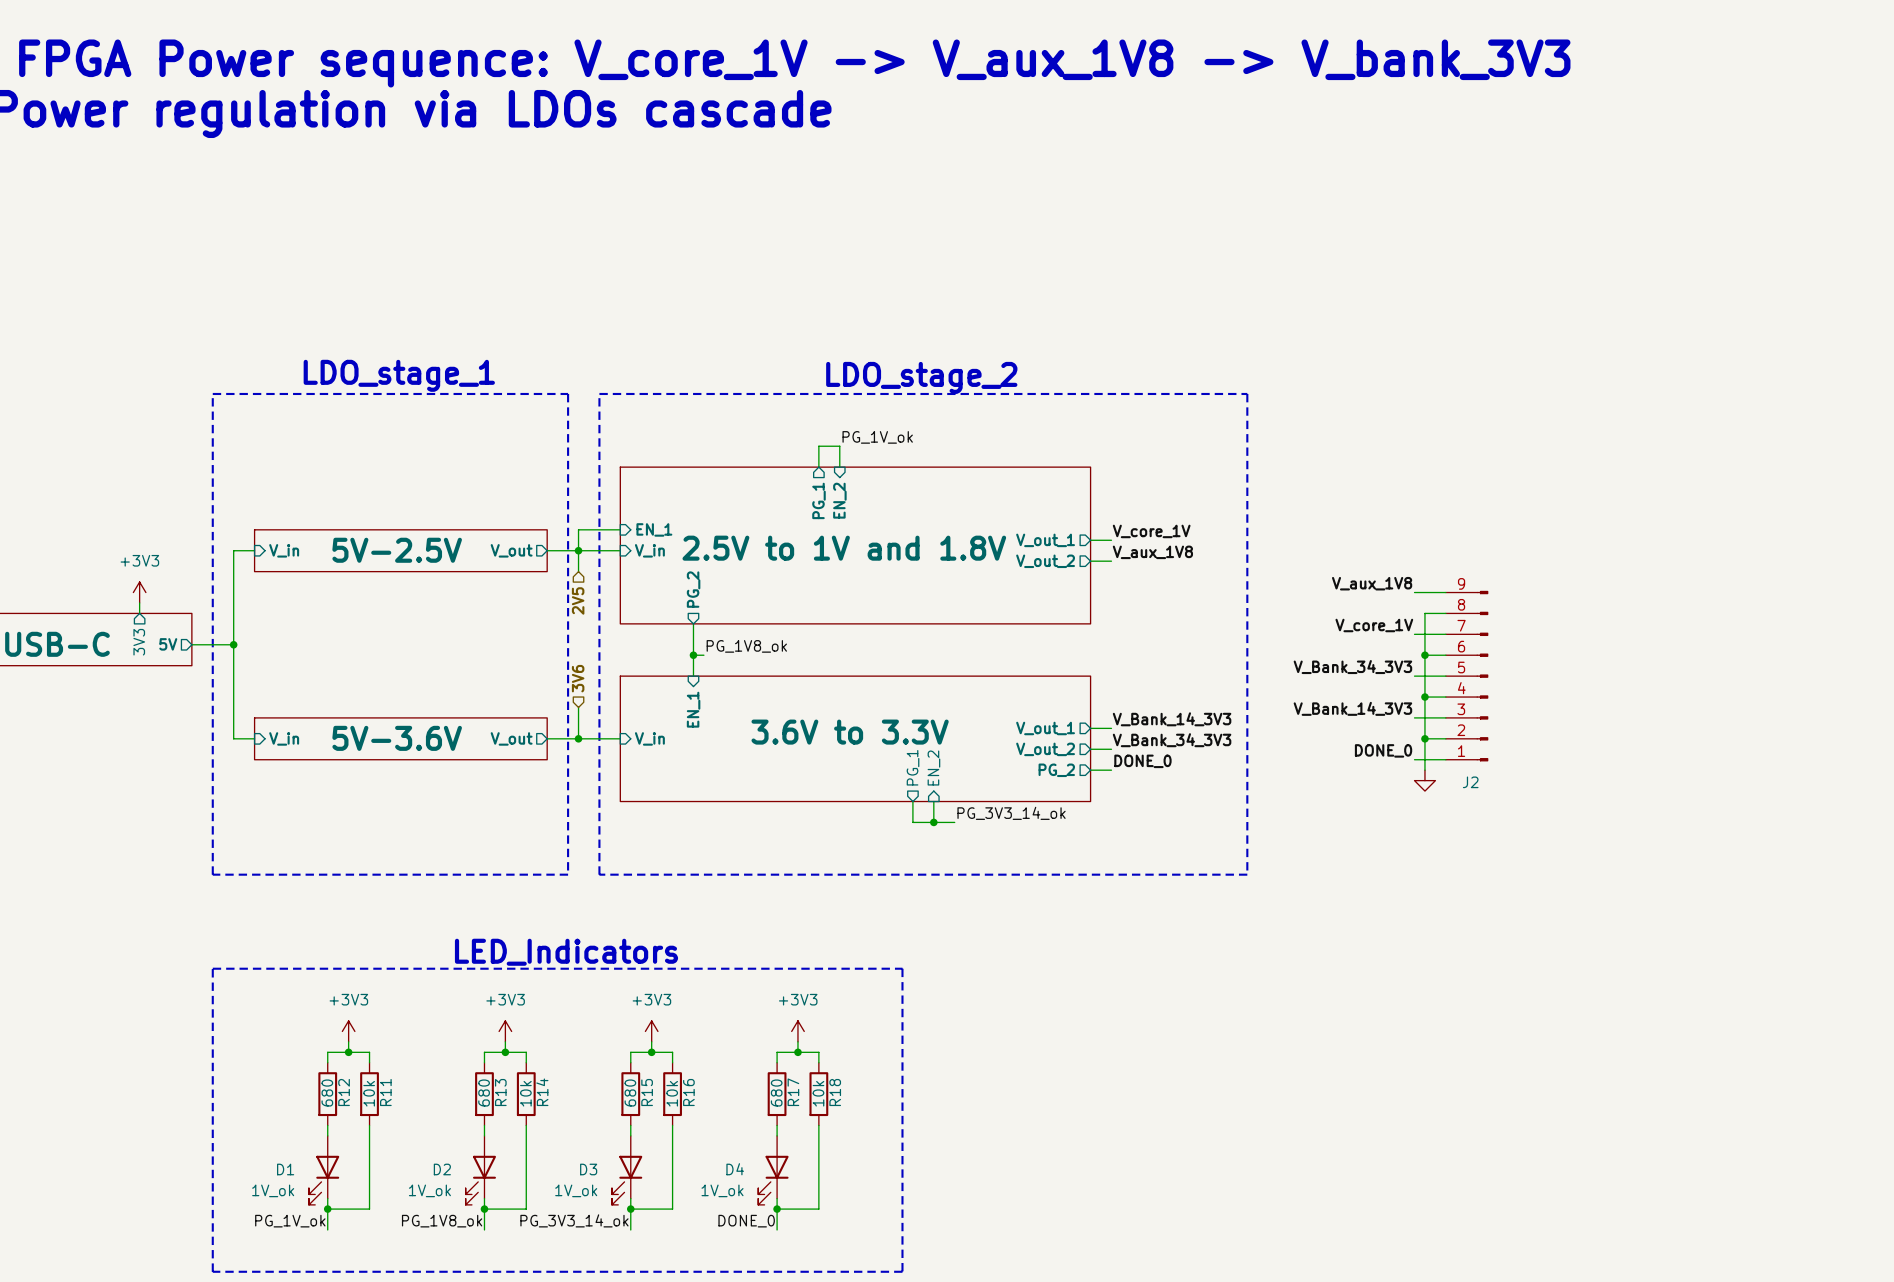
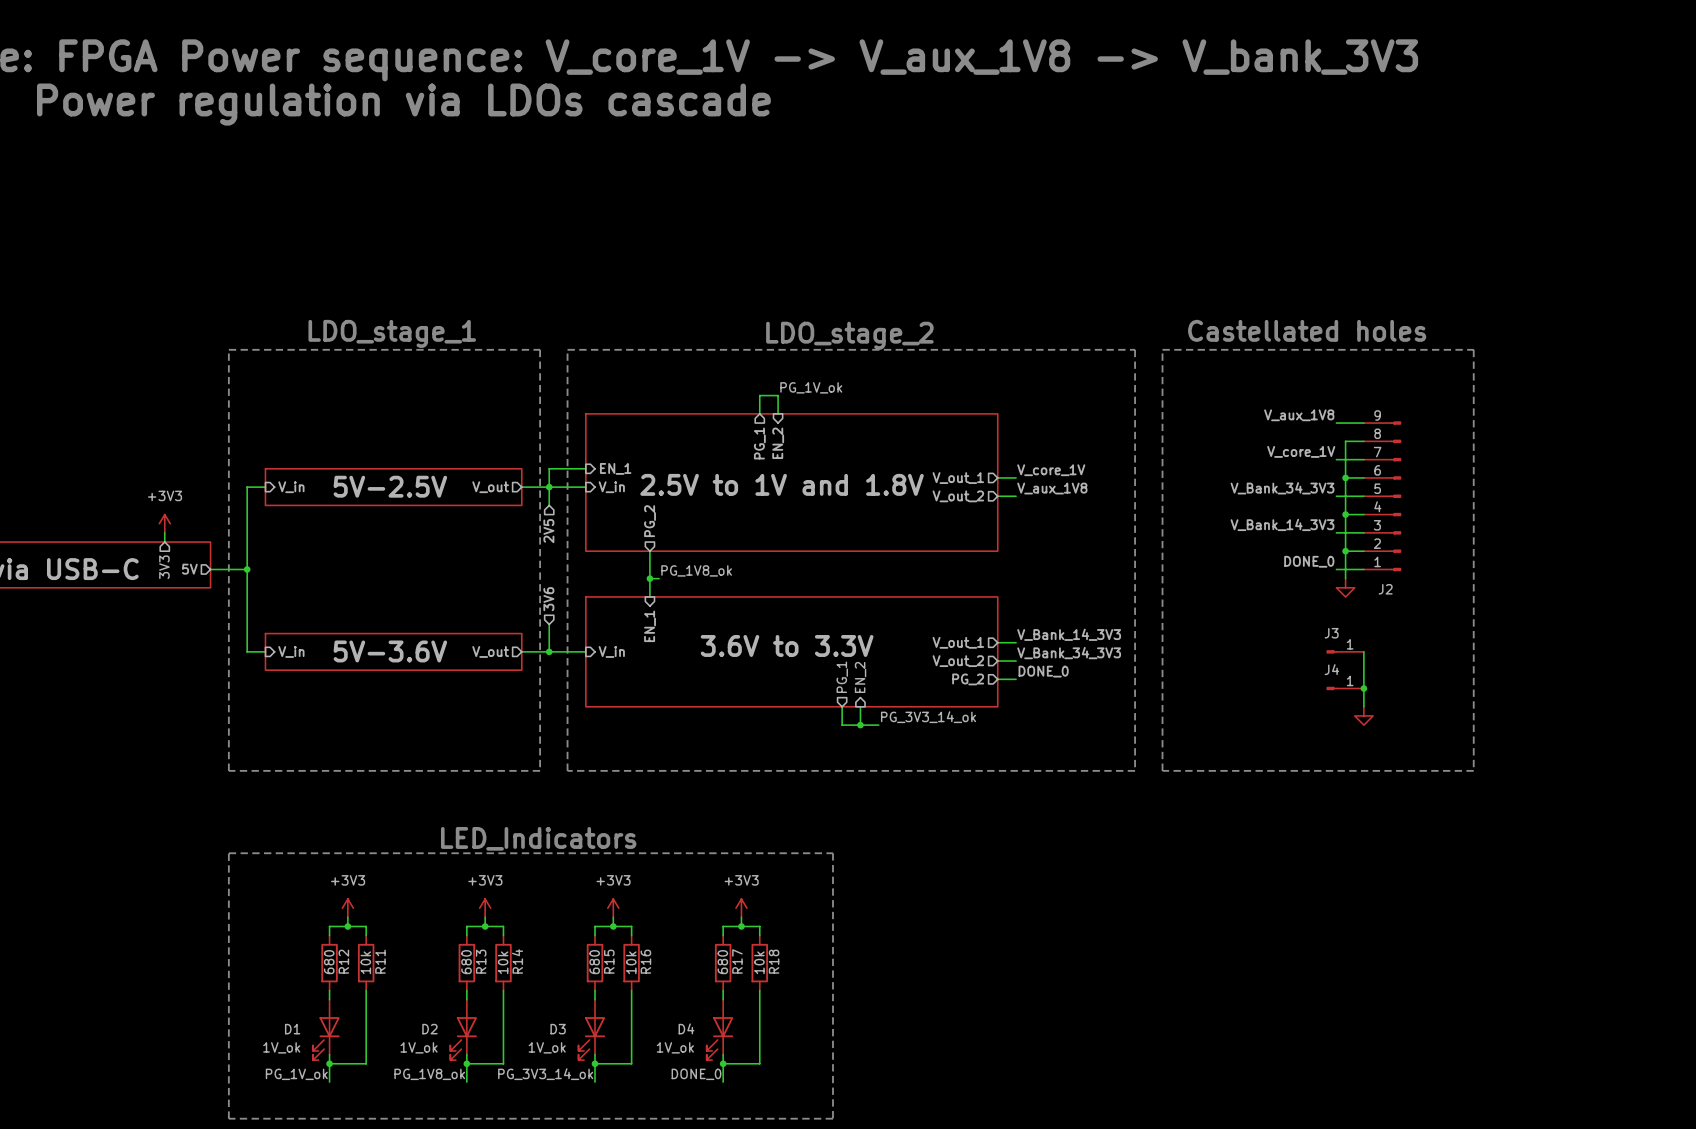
text: none -> Castellated holes (1307, 330)
line: none -> (1162, 349) (1473, 349) (1473, 770) (1162, 770) (1162, 349)
junction: none -> (1345, 477)
junction: none -> (1345, 514)
label position: V_aux_1V8 (1372, 583) -> V_aux_1V8 (1299, 415)
wire: (1414, 592) (1445, 592) -> (1336, 423) (1363, 423)
wire: (1445, 613) (1424, 613) (1424, 770) -> (1363, 441) (1345, 441) (1345, 578)
junction: none -> (1345, 551)
label position: V_core_1V (1374, 625) -> V_core_1V (1301, 451)
wire: (1414, 634) (1445, 634) -> (1336, 459) (1363, 459)
wire: (1424, 655) (1445, 655) -> (1345, 477) (1363, 477)
junction: (1424, 655) -> none
power symbol: none -> (1345, 587)
label position: V_Bank_34_3V3 (1352, 667) -> V_Bank_34_3V3 (1282, 488)
wire: (1414, 676) (1445, 676) -> (1336, 496) (1363, 496)
J2 position: (1467, 676) -> (1382, 496)
wire: (1424, 697) (1445, 697) -> (1345, 514) (1363, 514)
junction: (1424, 697) -> none
label position: V_Bank_14_3V3 (1352, 708) -> V_Bank_14_3V3 (1282, 524)
wire: (1414, 717) (1445, 717) -> (1336, 532) (1363, 532)
wire: (1424, 738) (1445, 738) -> (1345, 551) (1363, 551)
junction: (1424, 738) -> none
J3: none -> (1345, 651)
wire: none -> (1363, 651) (1363, 706)
label position: DONE_0 (1383, 750) -> DONE_0 (1309, 561)
wire: (1414, 759) (1445, 759) -> (1336, 569) (1363, 569)
power symbol: (1424, 780) -> none
J4: none -> (1345, 688)
junction: none -> (1363, 688)
power symbol: none -> (1363, 715)

